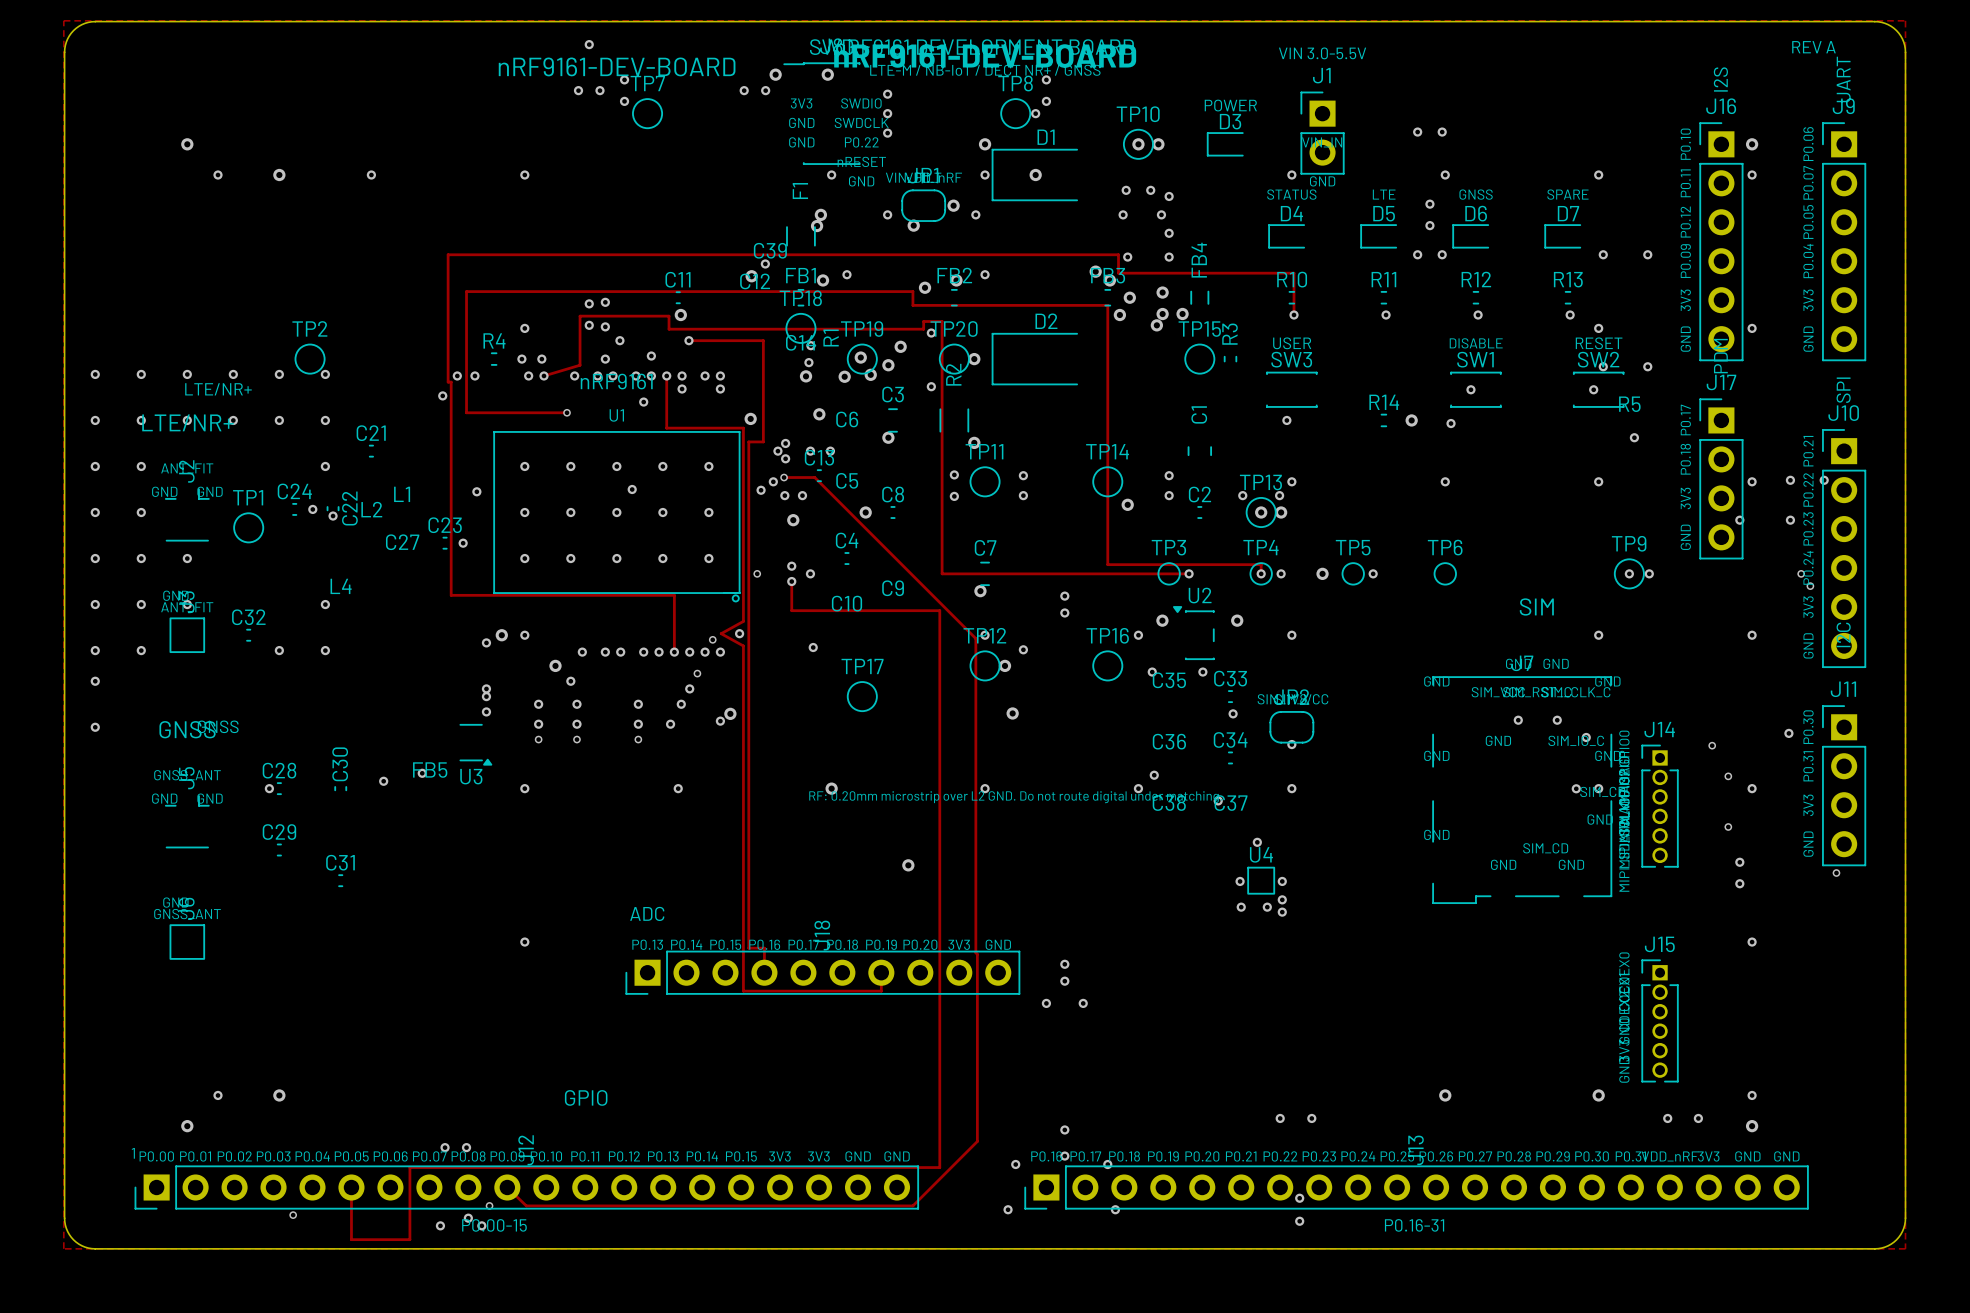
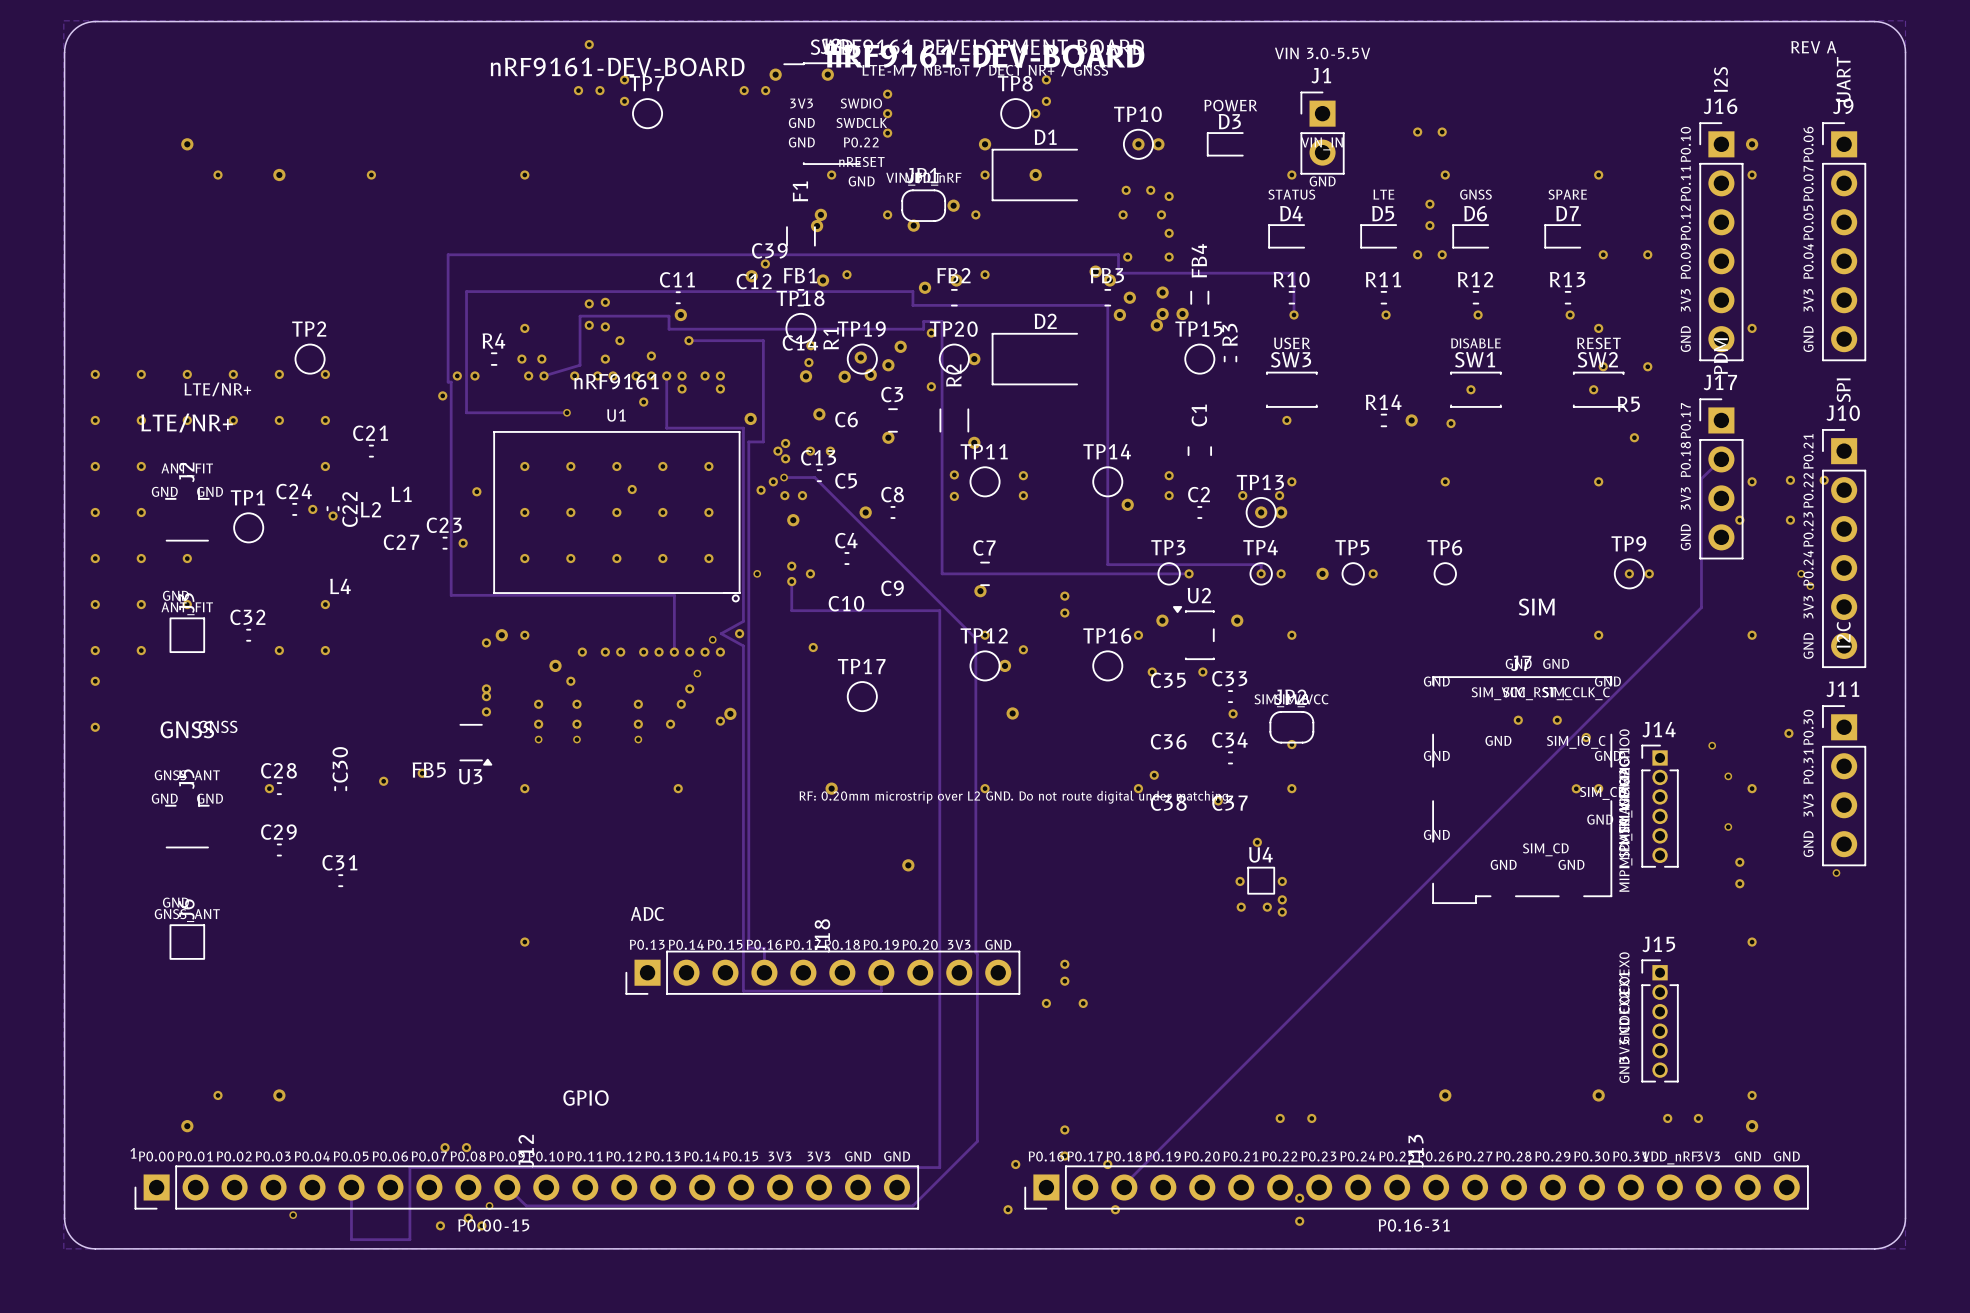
track: none -> (1721, 459) (1701, 478) (1701, 607) (1121, 1187)

